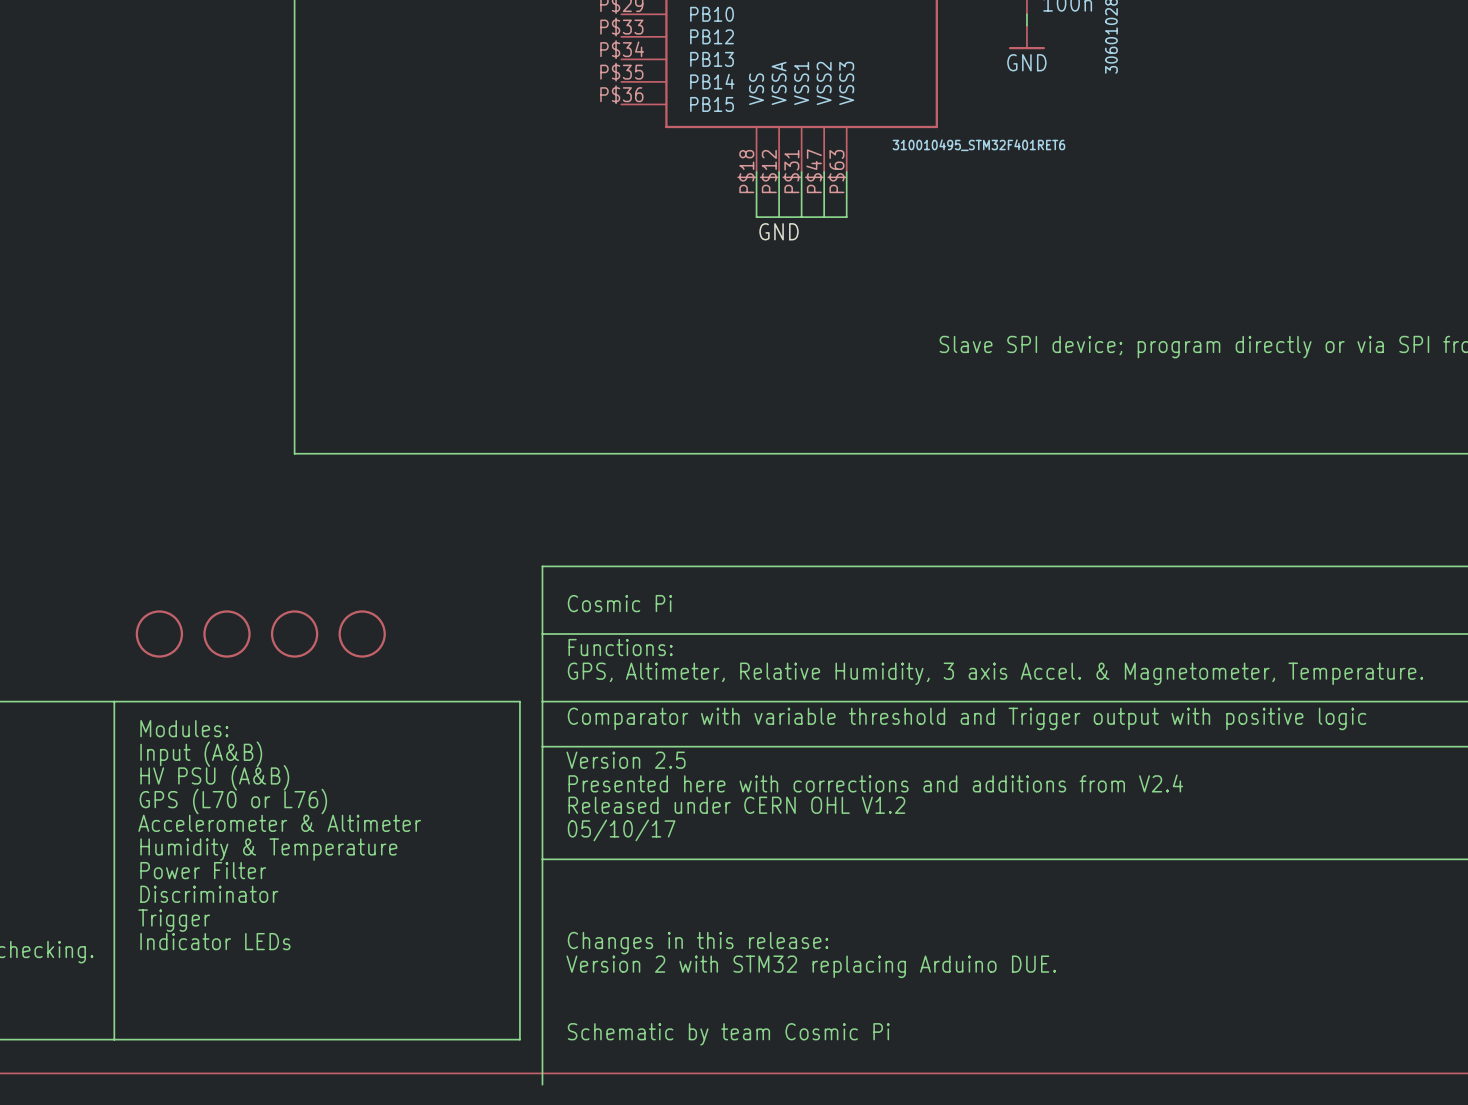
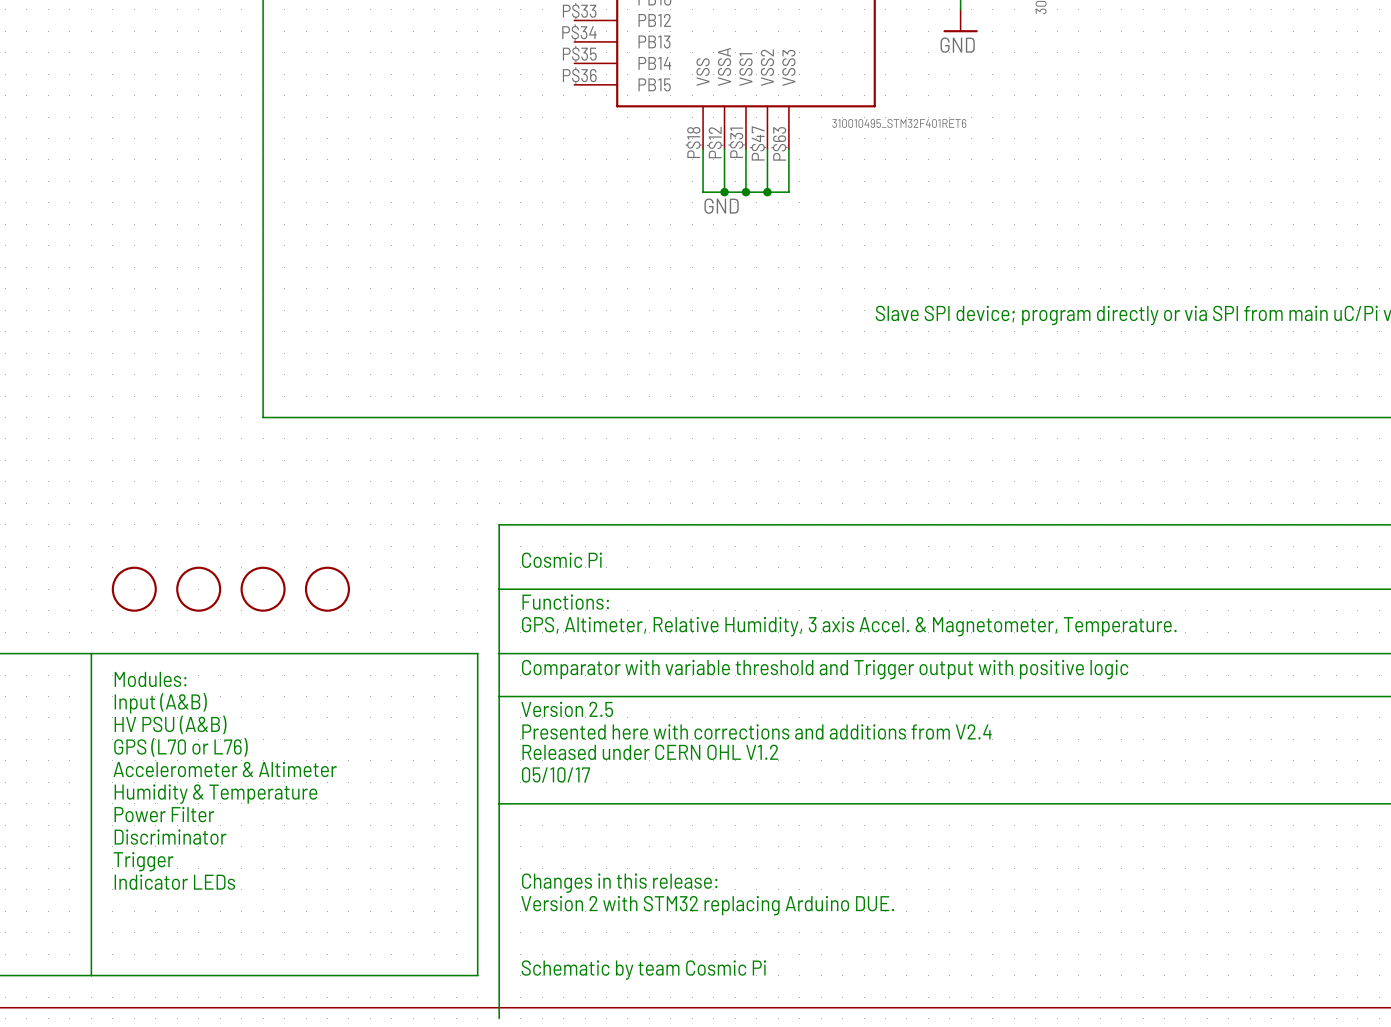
junction: none -> (724, 192)
junction: none -> (745, 192)
junction: none -> (767, 192)

